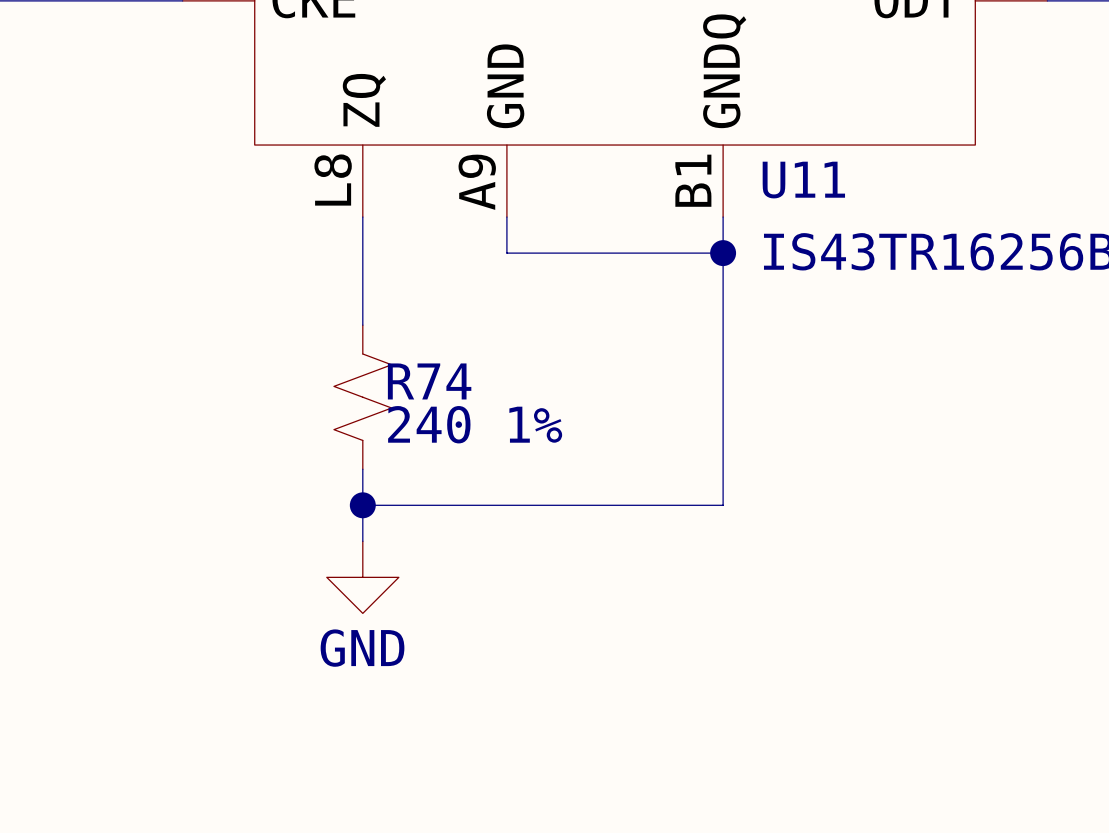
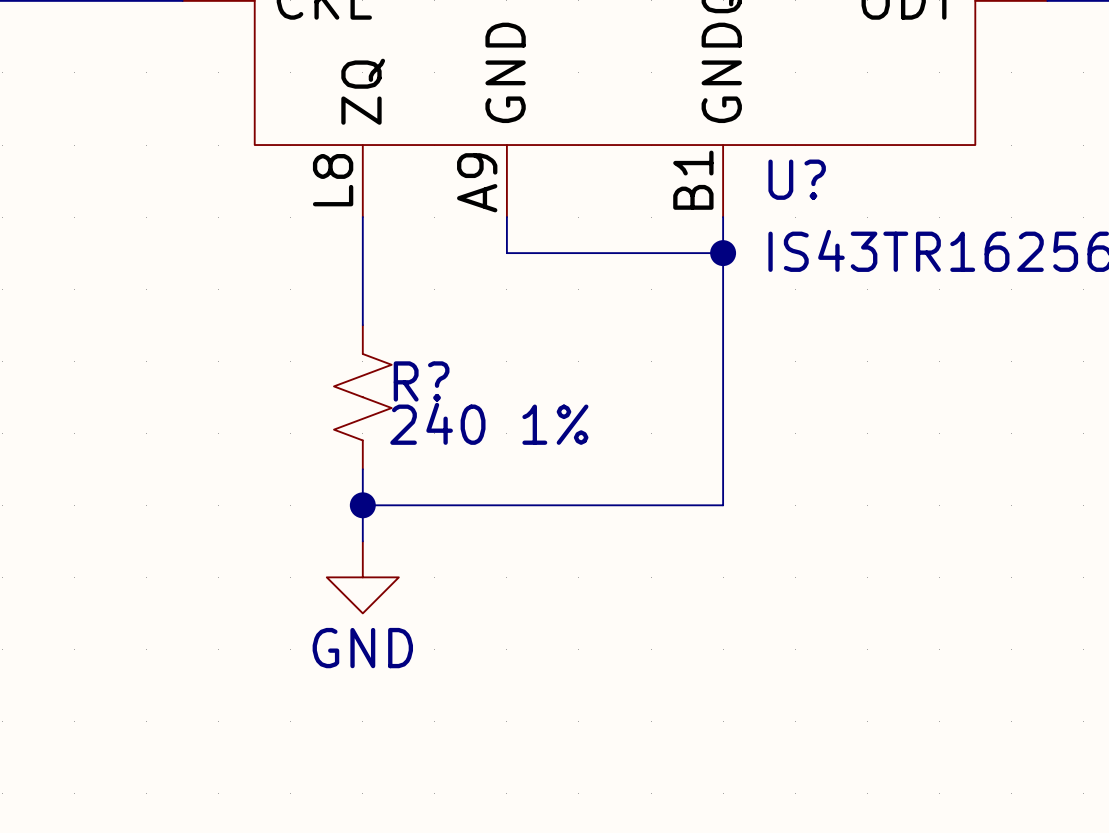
U11 name: U11 (803, 180) -> U? (797, 179)
R74 name: R74 (429, 381) -> R? (421, 381)

